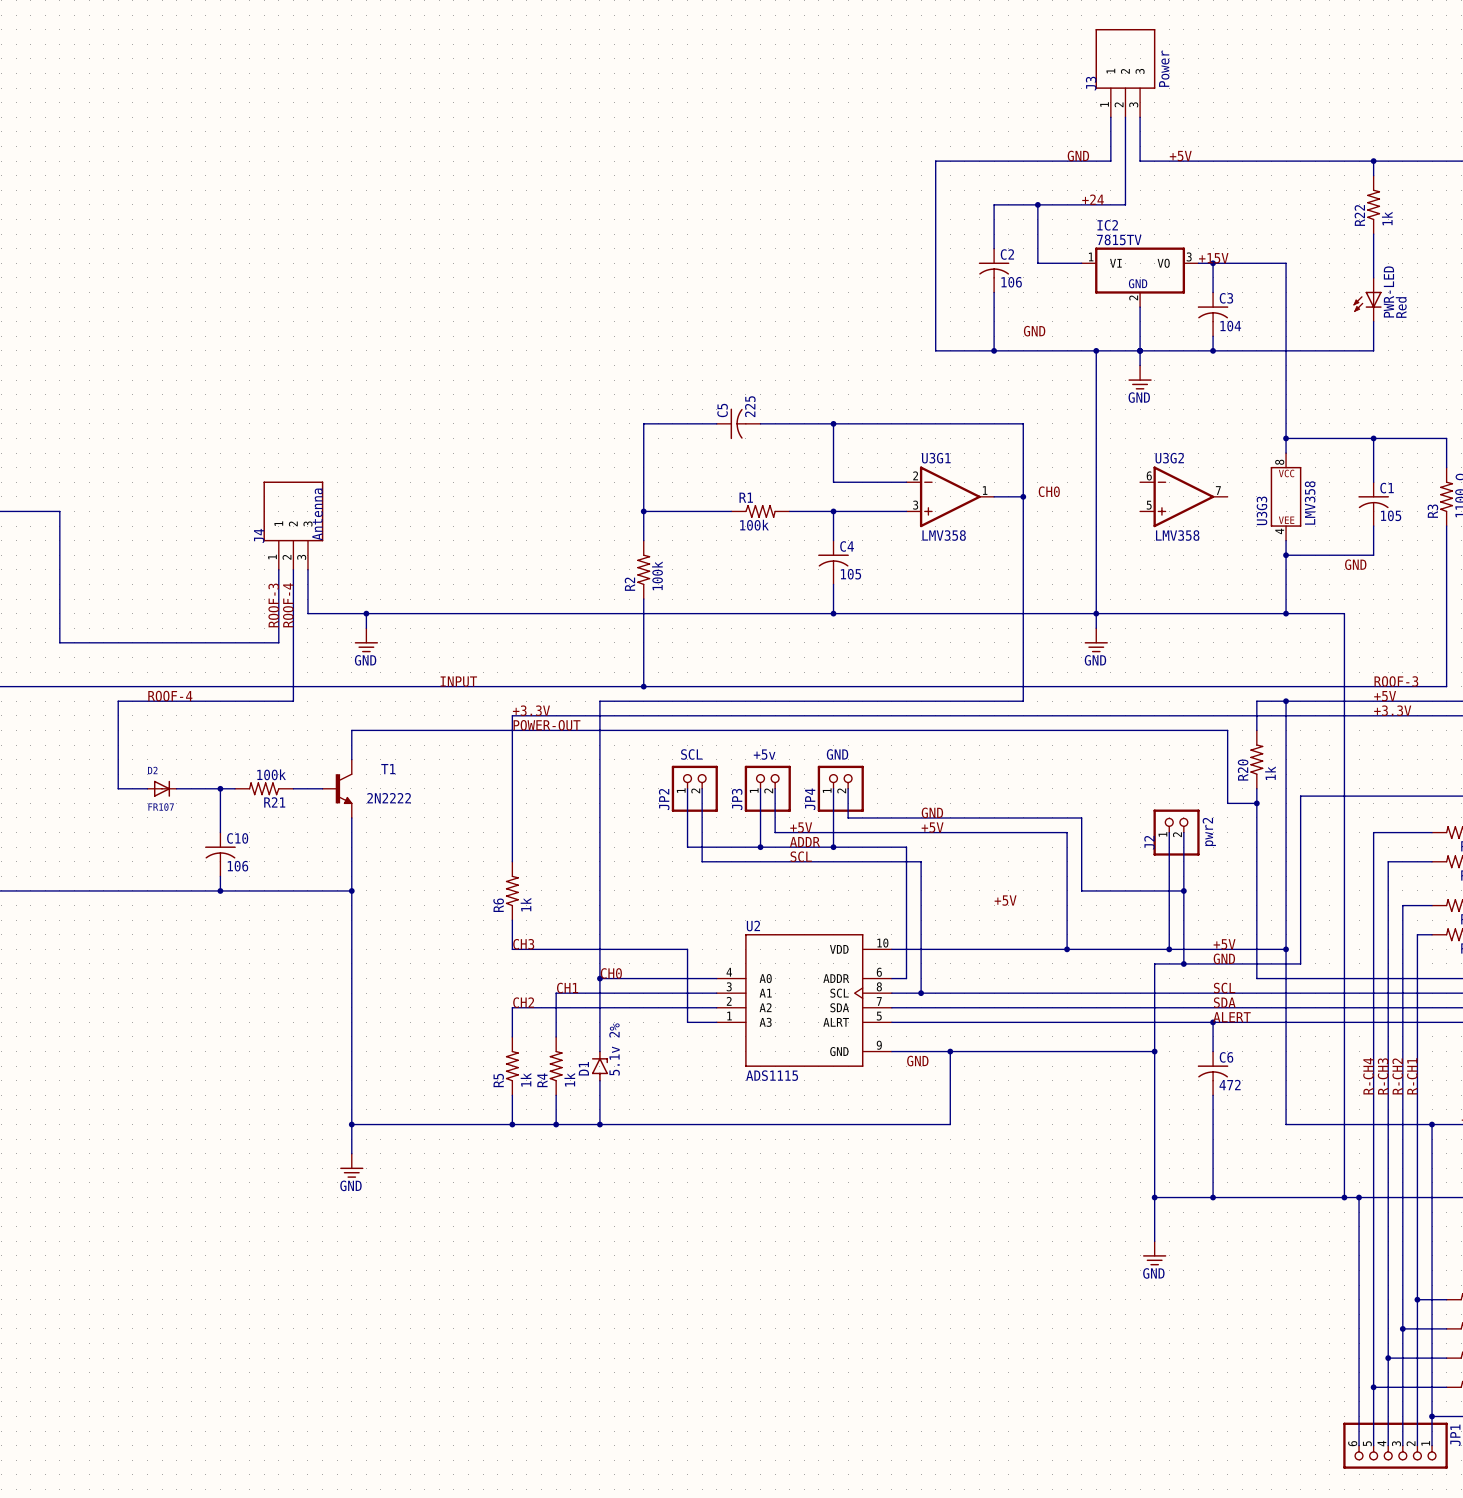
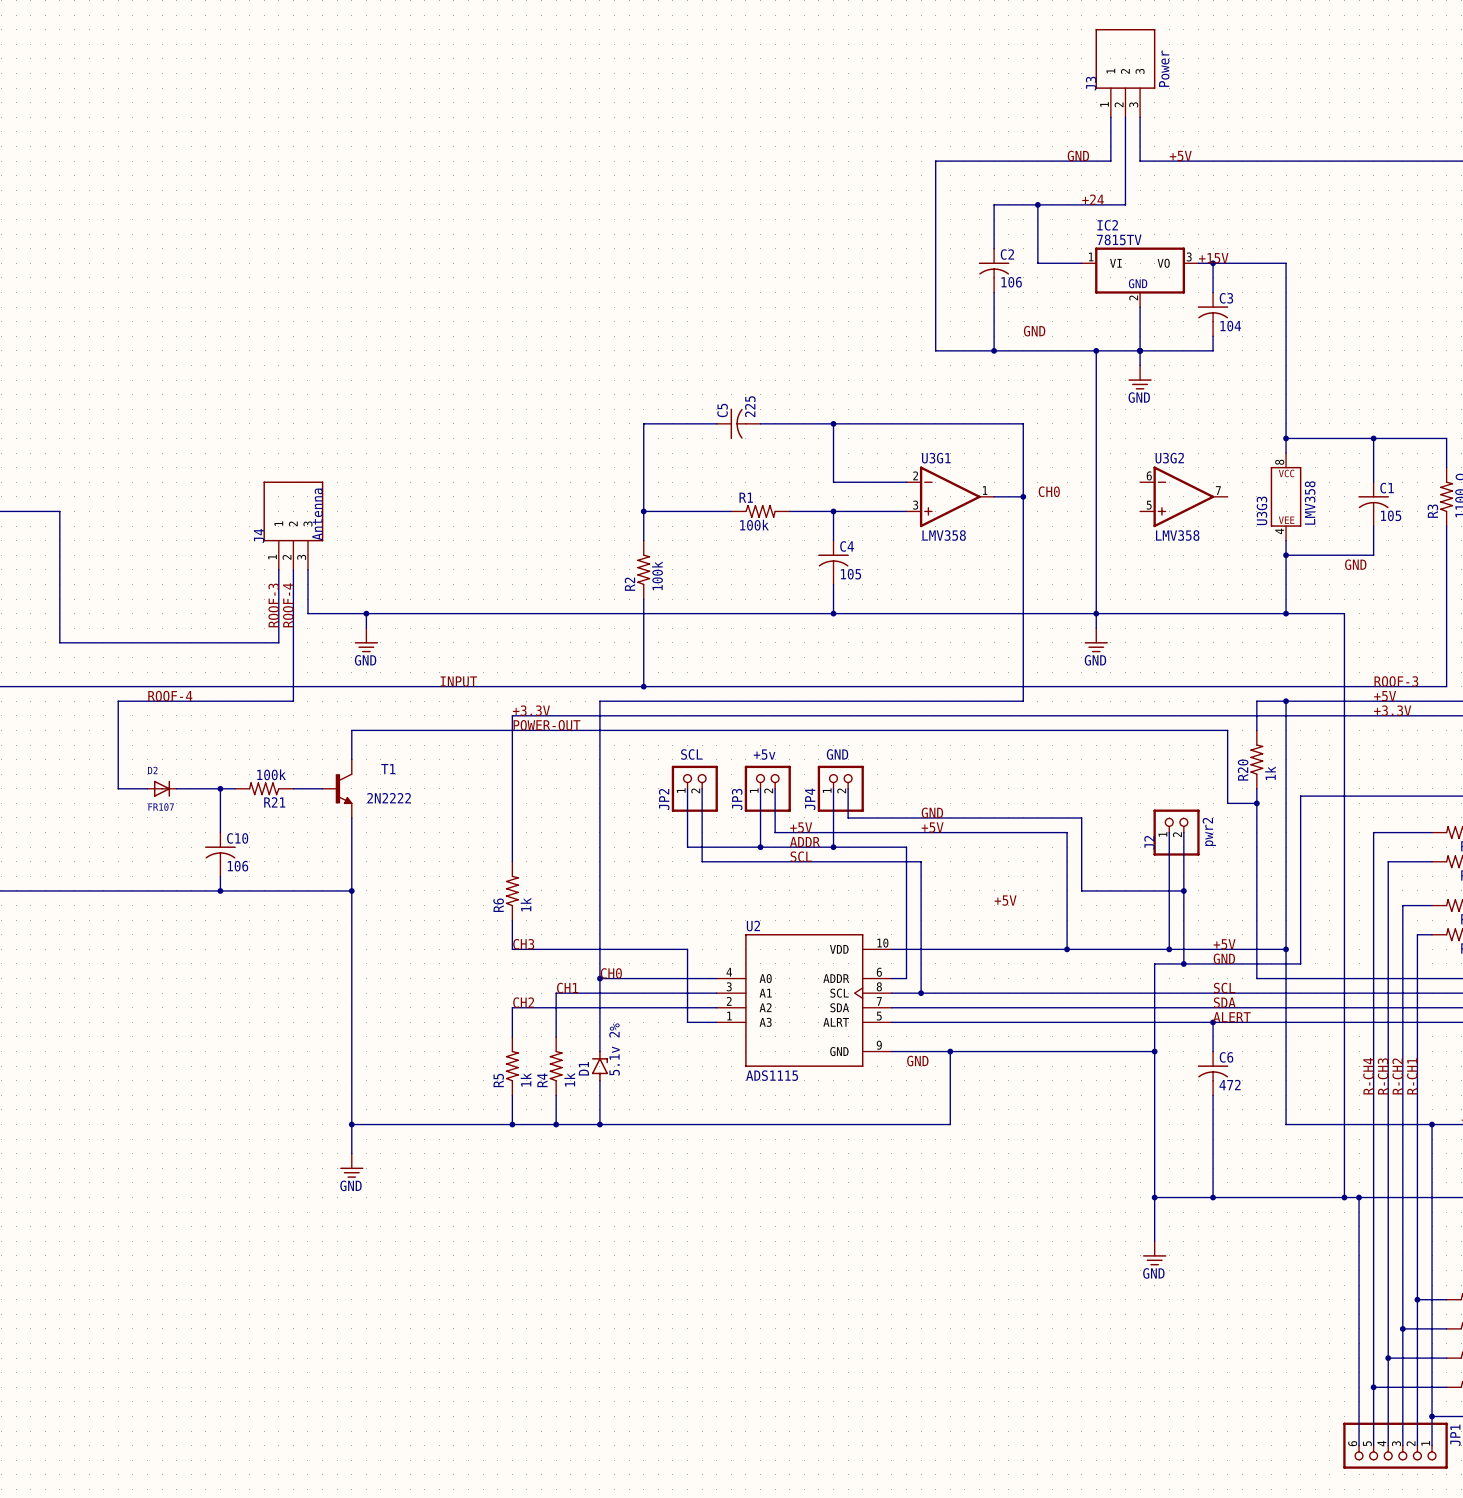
wire: (1373, 161) (1373, 175) -> none
junction: (1373, 161) -> none
R22: 1k (1373, 204) -> none
wire: (1373, 234) (1373, 277) -> none
PWR-LED: Red (1367, 299) -> none
wire: (1373, 321) (1373, 350) (1213, 350) -> none
junction: (1213, 350) -> none

